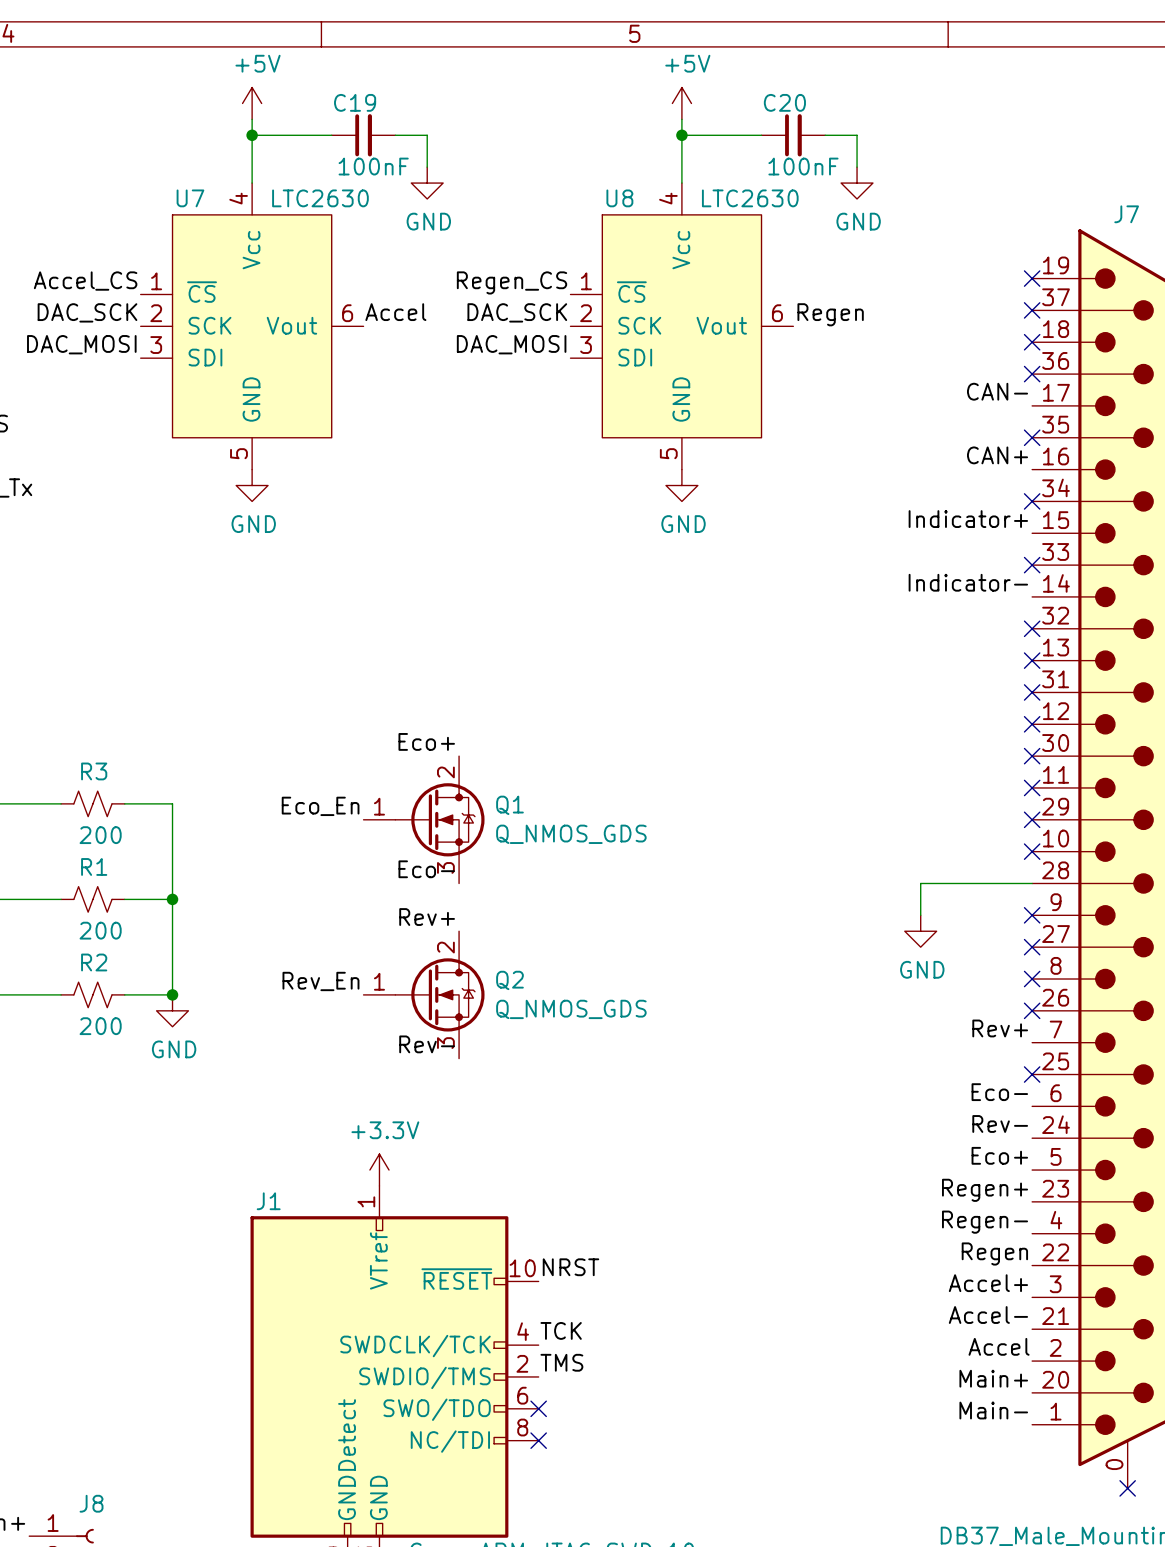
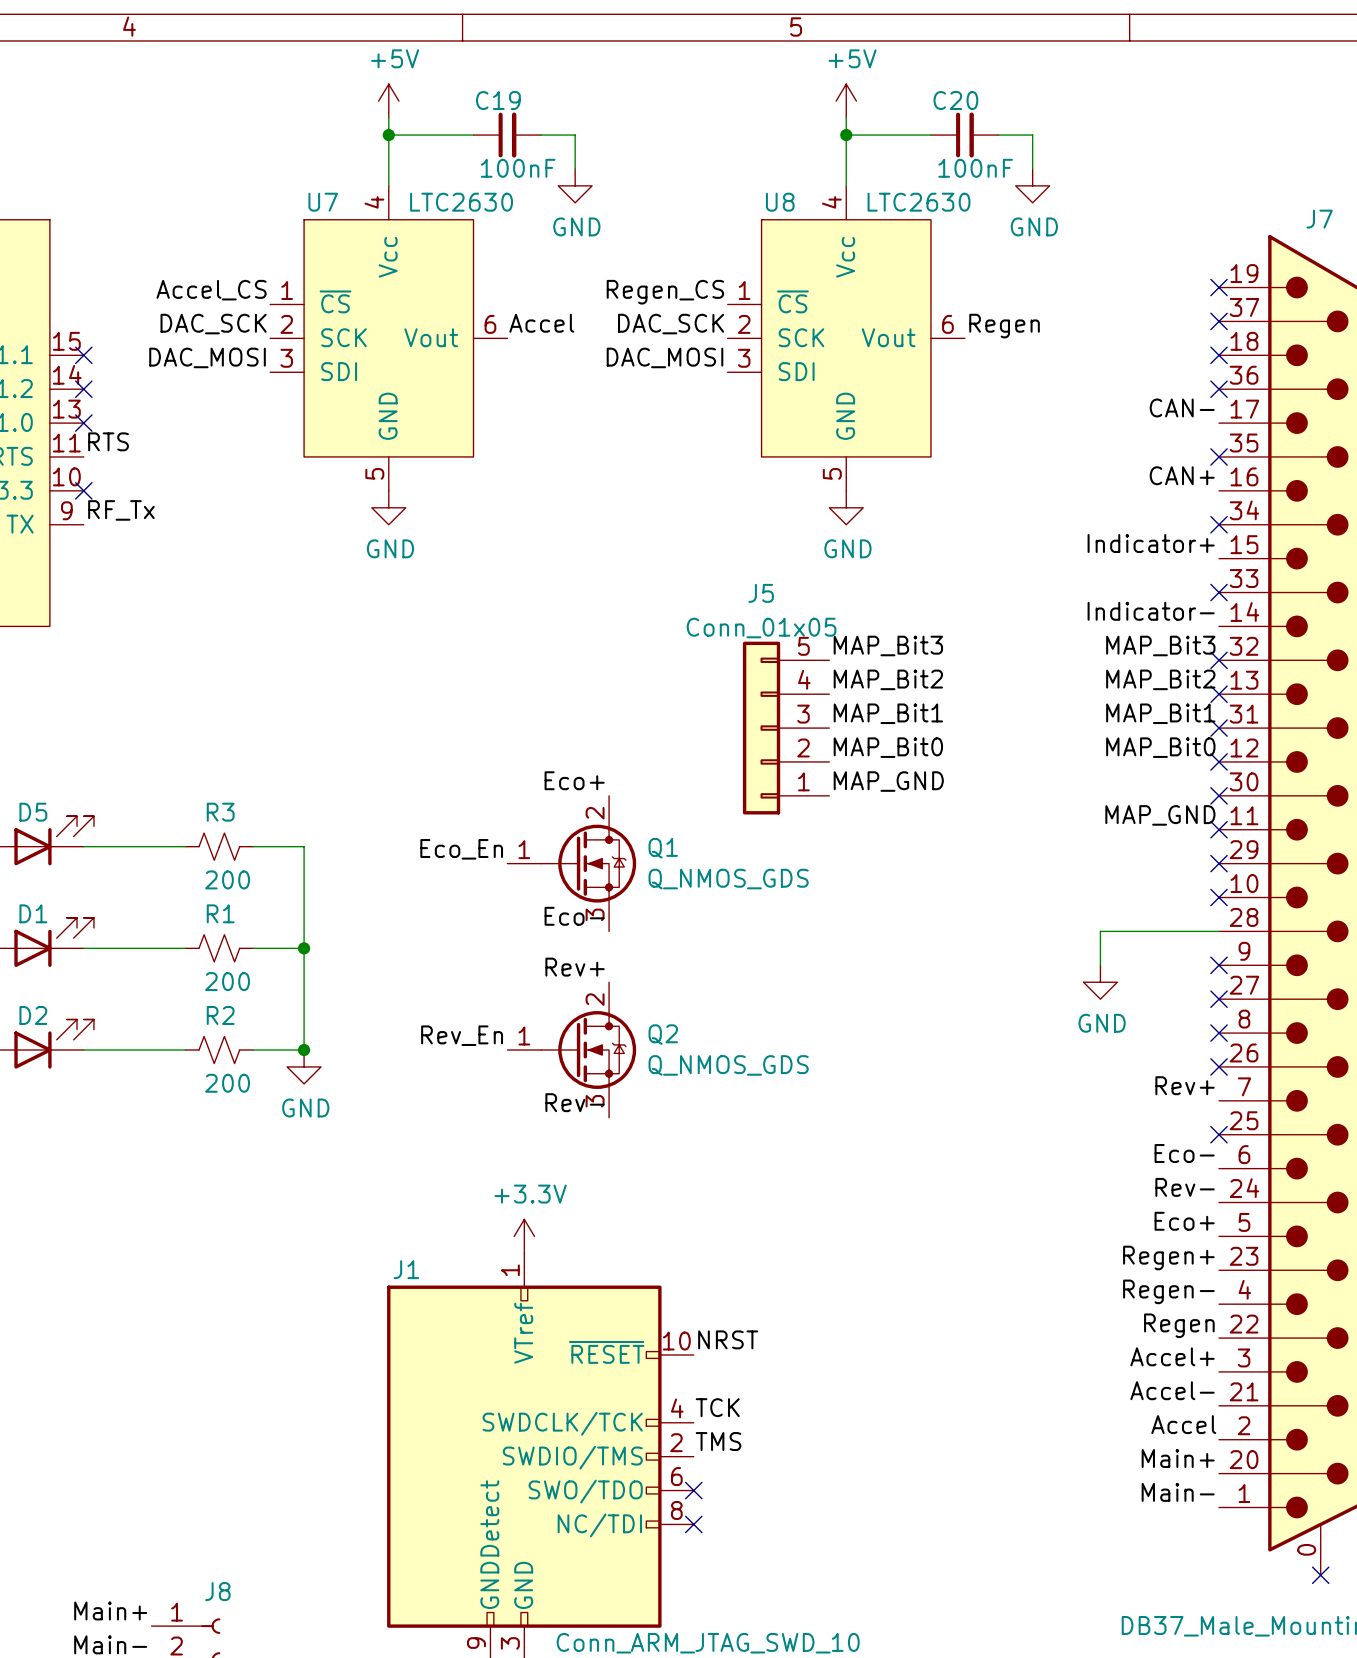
label: none -> MAP_Bit3 (888, 645)
label: none -> MAP_Bit3 (1160, 645)
label: none -> MAP_Bit2 (888, 679)
label: none -> MAP_Bit2 (1160, 679)
label: none -> MAP_Bit1 (888, 713)
label: none -> MAP_Bit1 (1160, 713)
J5: none -> Conn_01x05 (786, 728)
label: none -> MAP_Bit0 (888, 747)
label: none -> MAP_Bit0 (1160, 747)
label: none -> MAP_GND (888, 781)
label: none -> MAP_GND (1160, 815)

